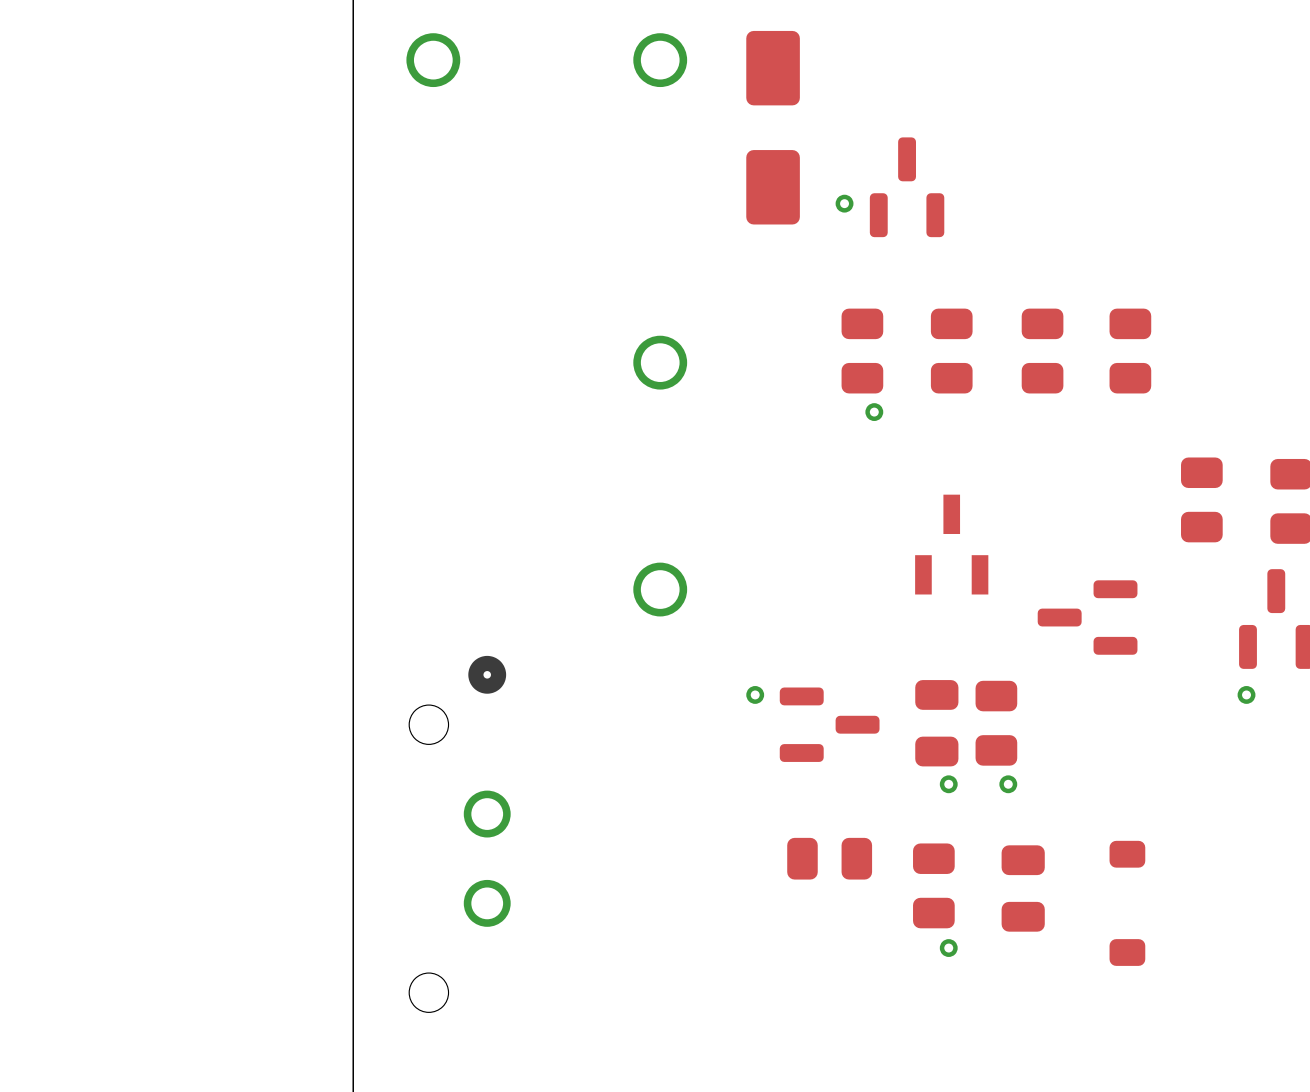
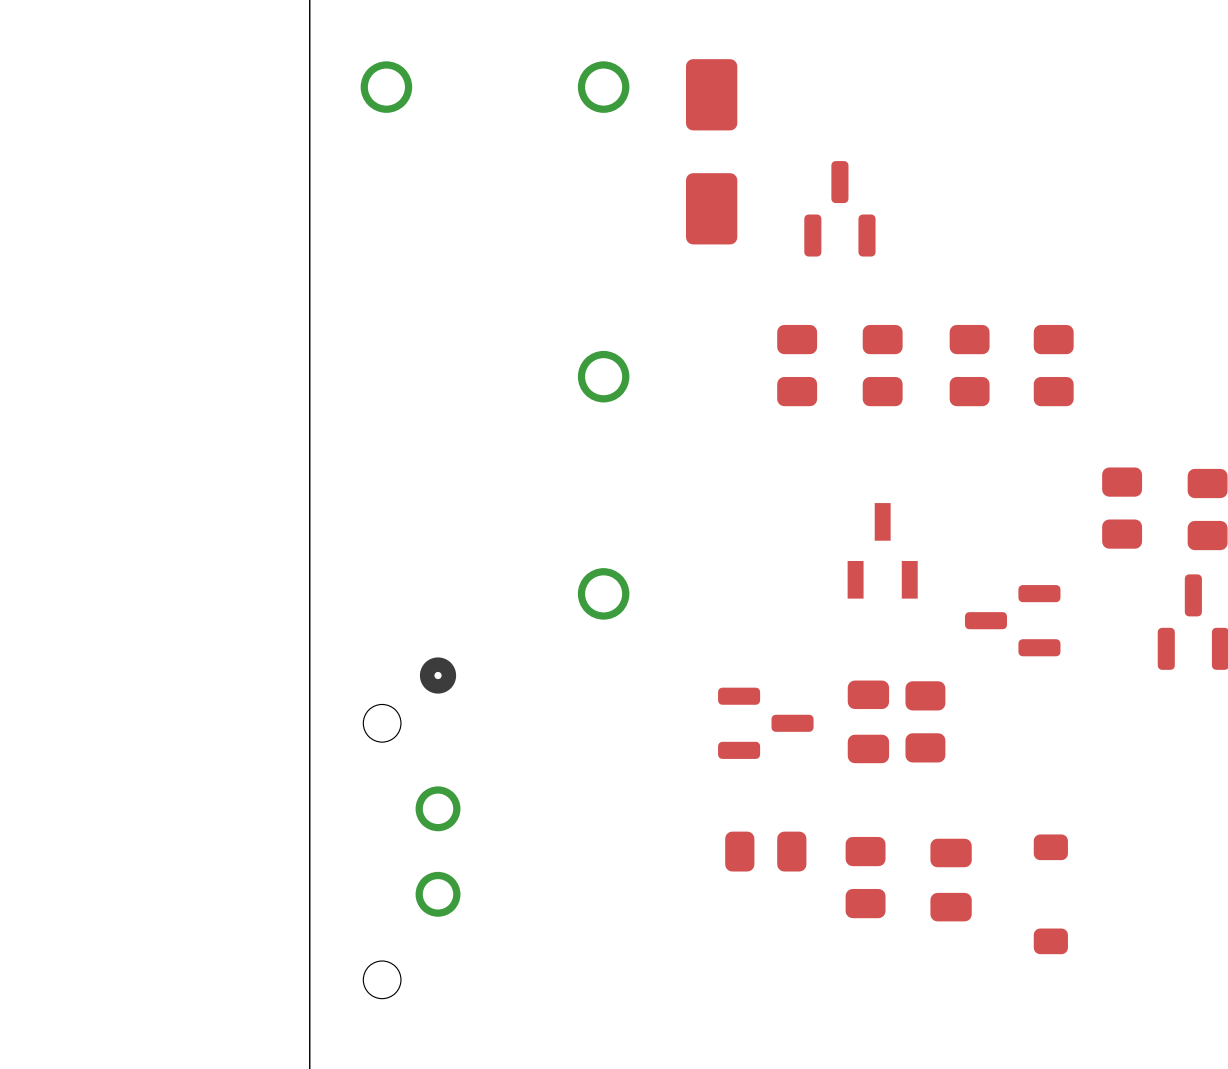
via: (844, 203) -> none
via: (874, 412) -> none
via: (755, 694) -> none
via: (1246, 694) -> none
via: (948, 784) -> none
via: (1008, 784) -> none
via: (948, 948) -> none

